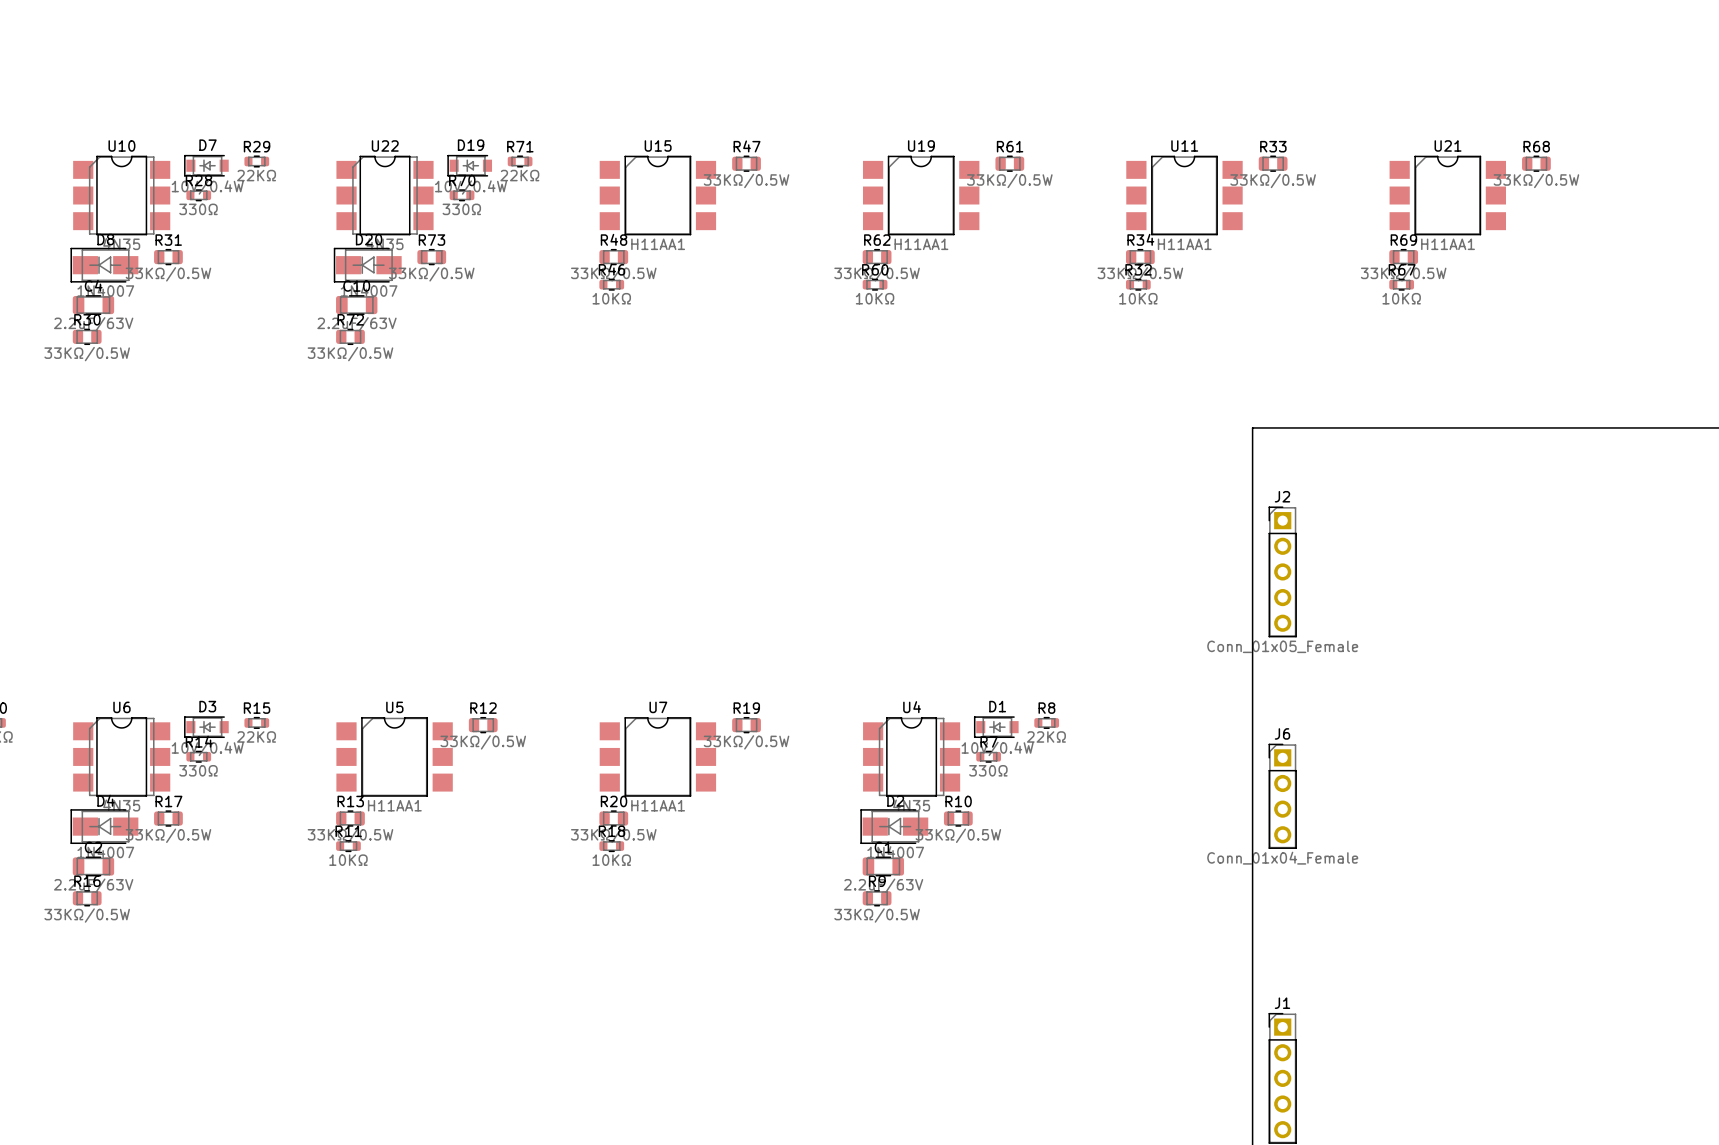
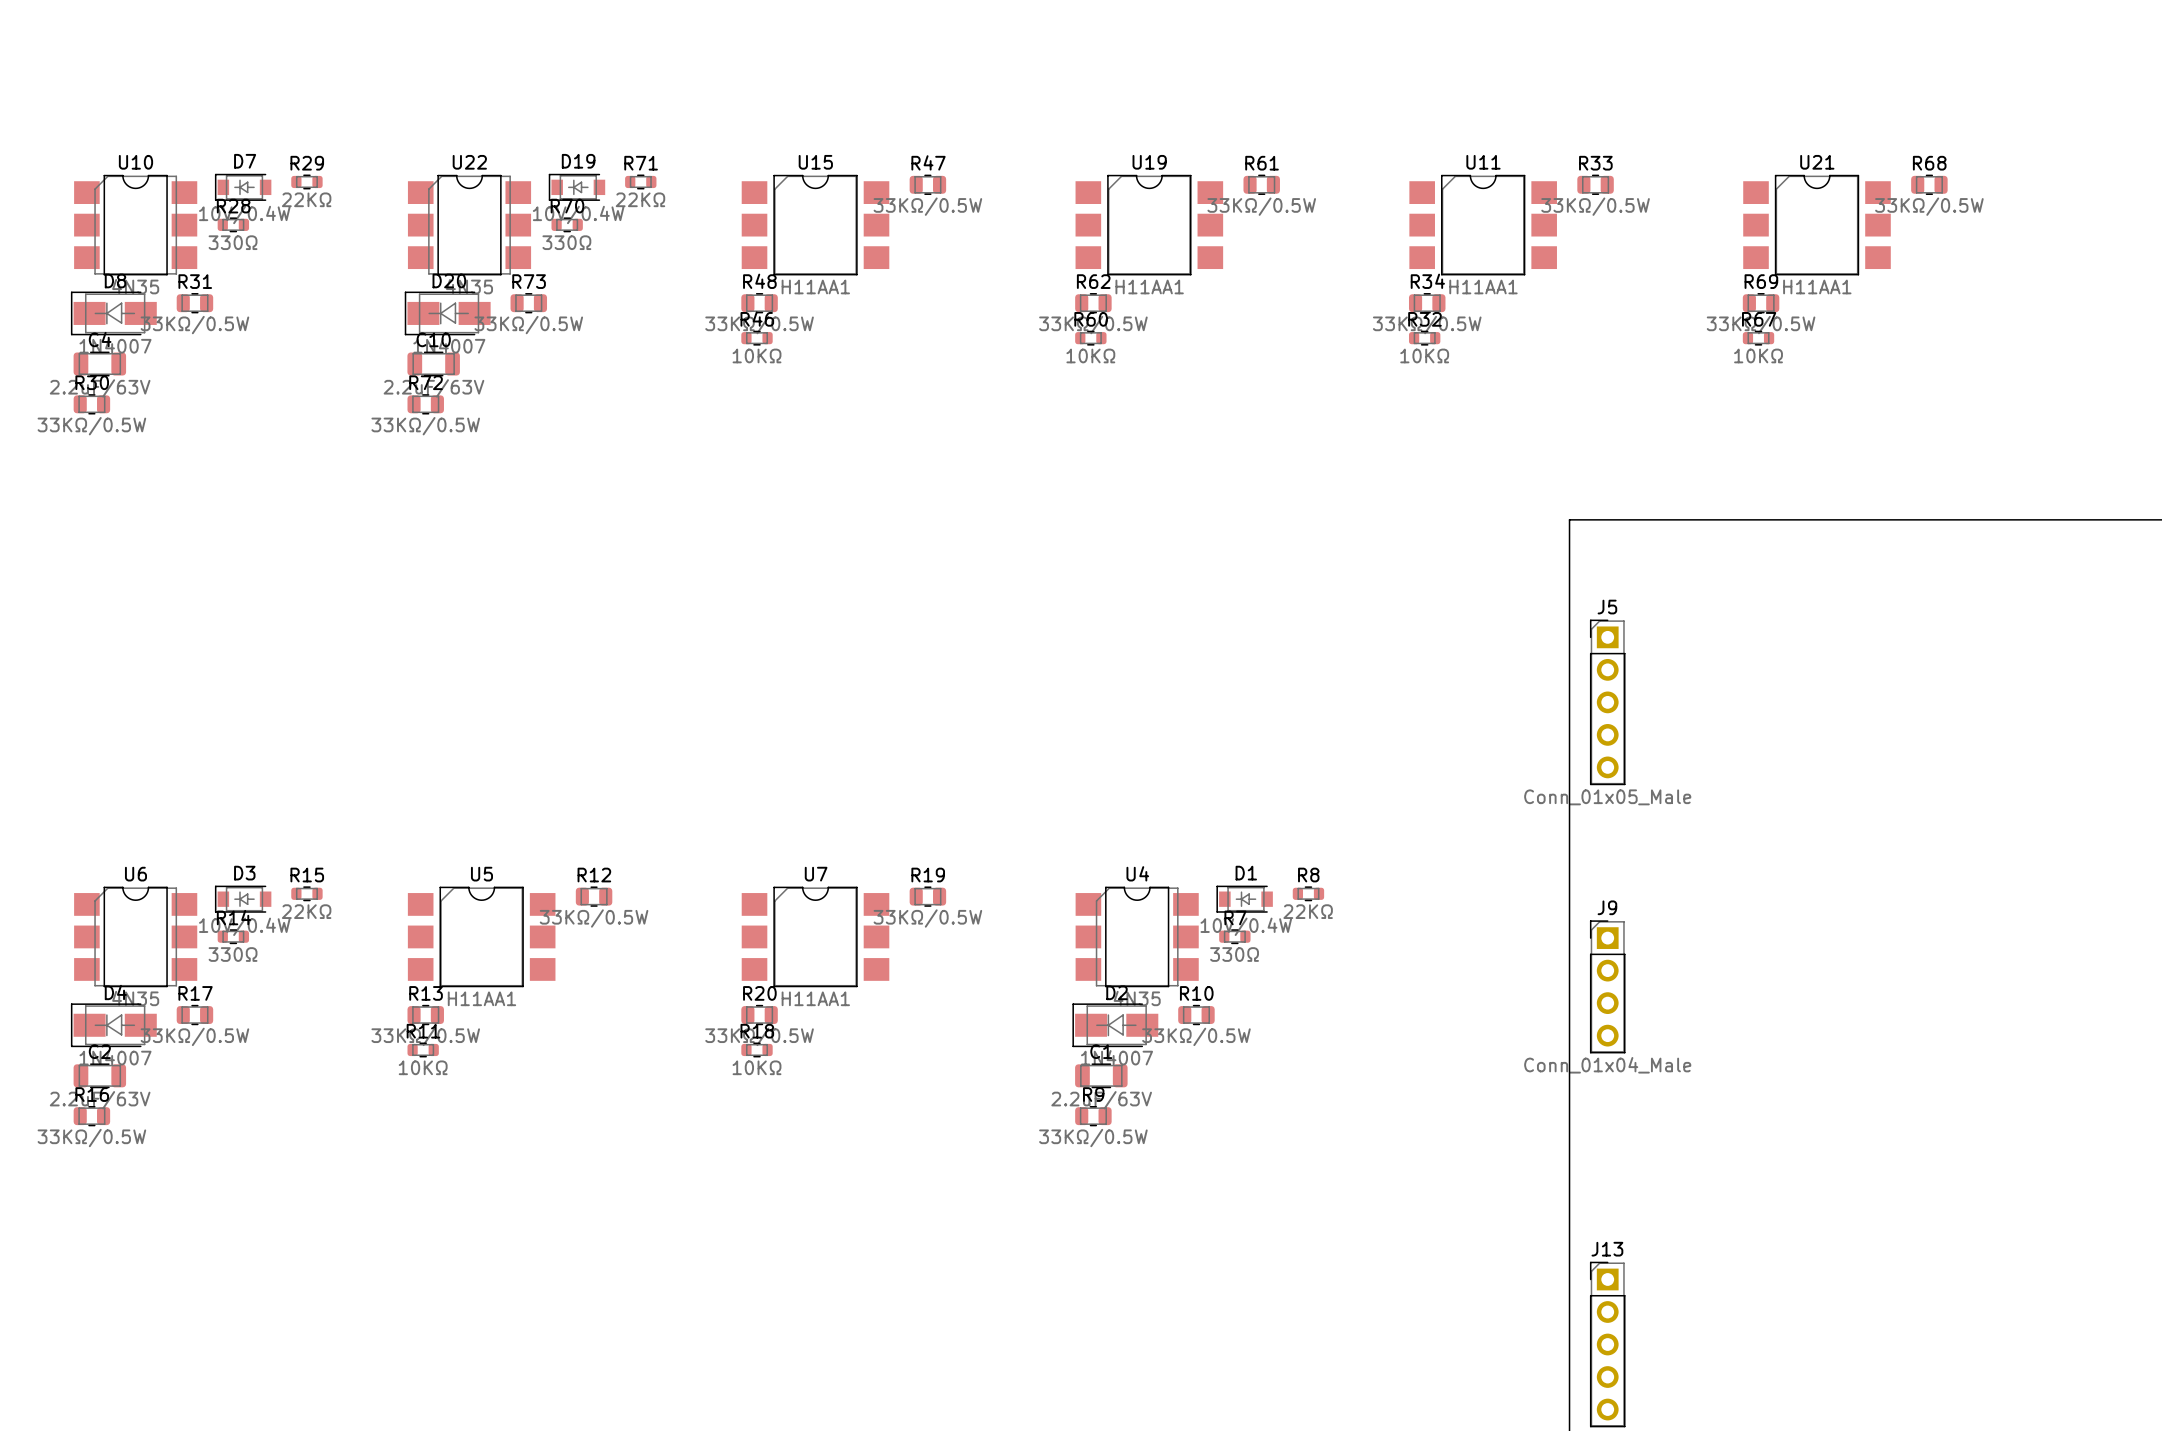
J2 name: J2 (1282, 496) -> J5 (1607, 607)
J2 value: Conn_01x05_Female (1282, 646) -> Conn_01x05_Male (1607, 797)
J6 name: J6 (1282, 733) -> J9 (1607, 907)
J6 value: Conn_01x04_Female (1282, 858) -> Conn_01x04_Male (1607, 1065)
J1 name: J1 (1282, 1003) -> J13 (1607, 1249)

